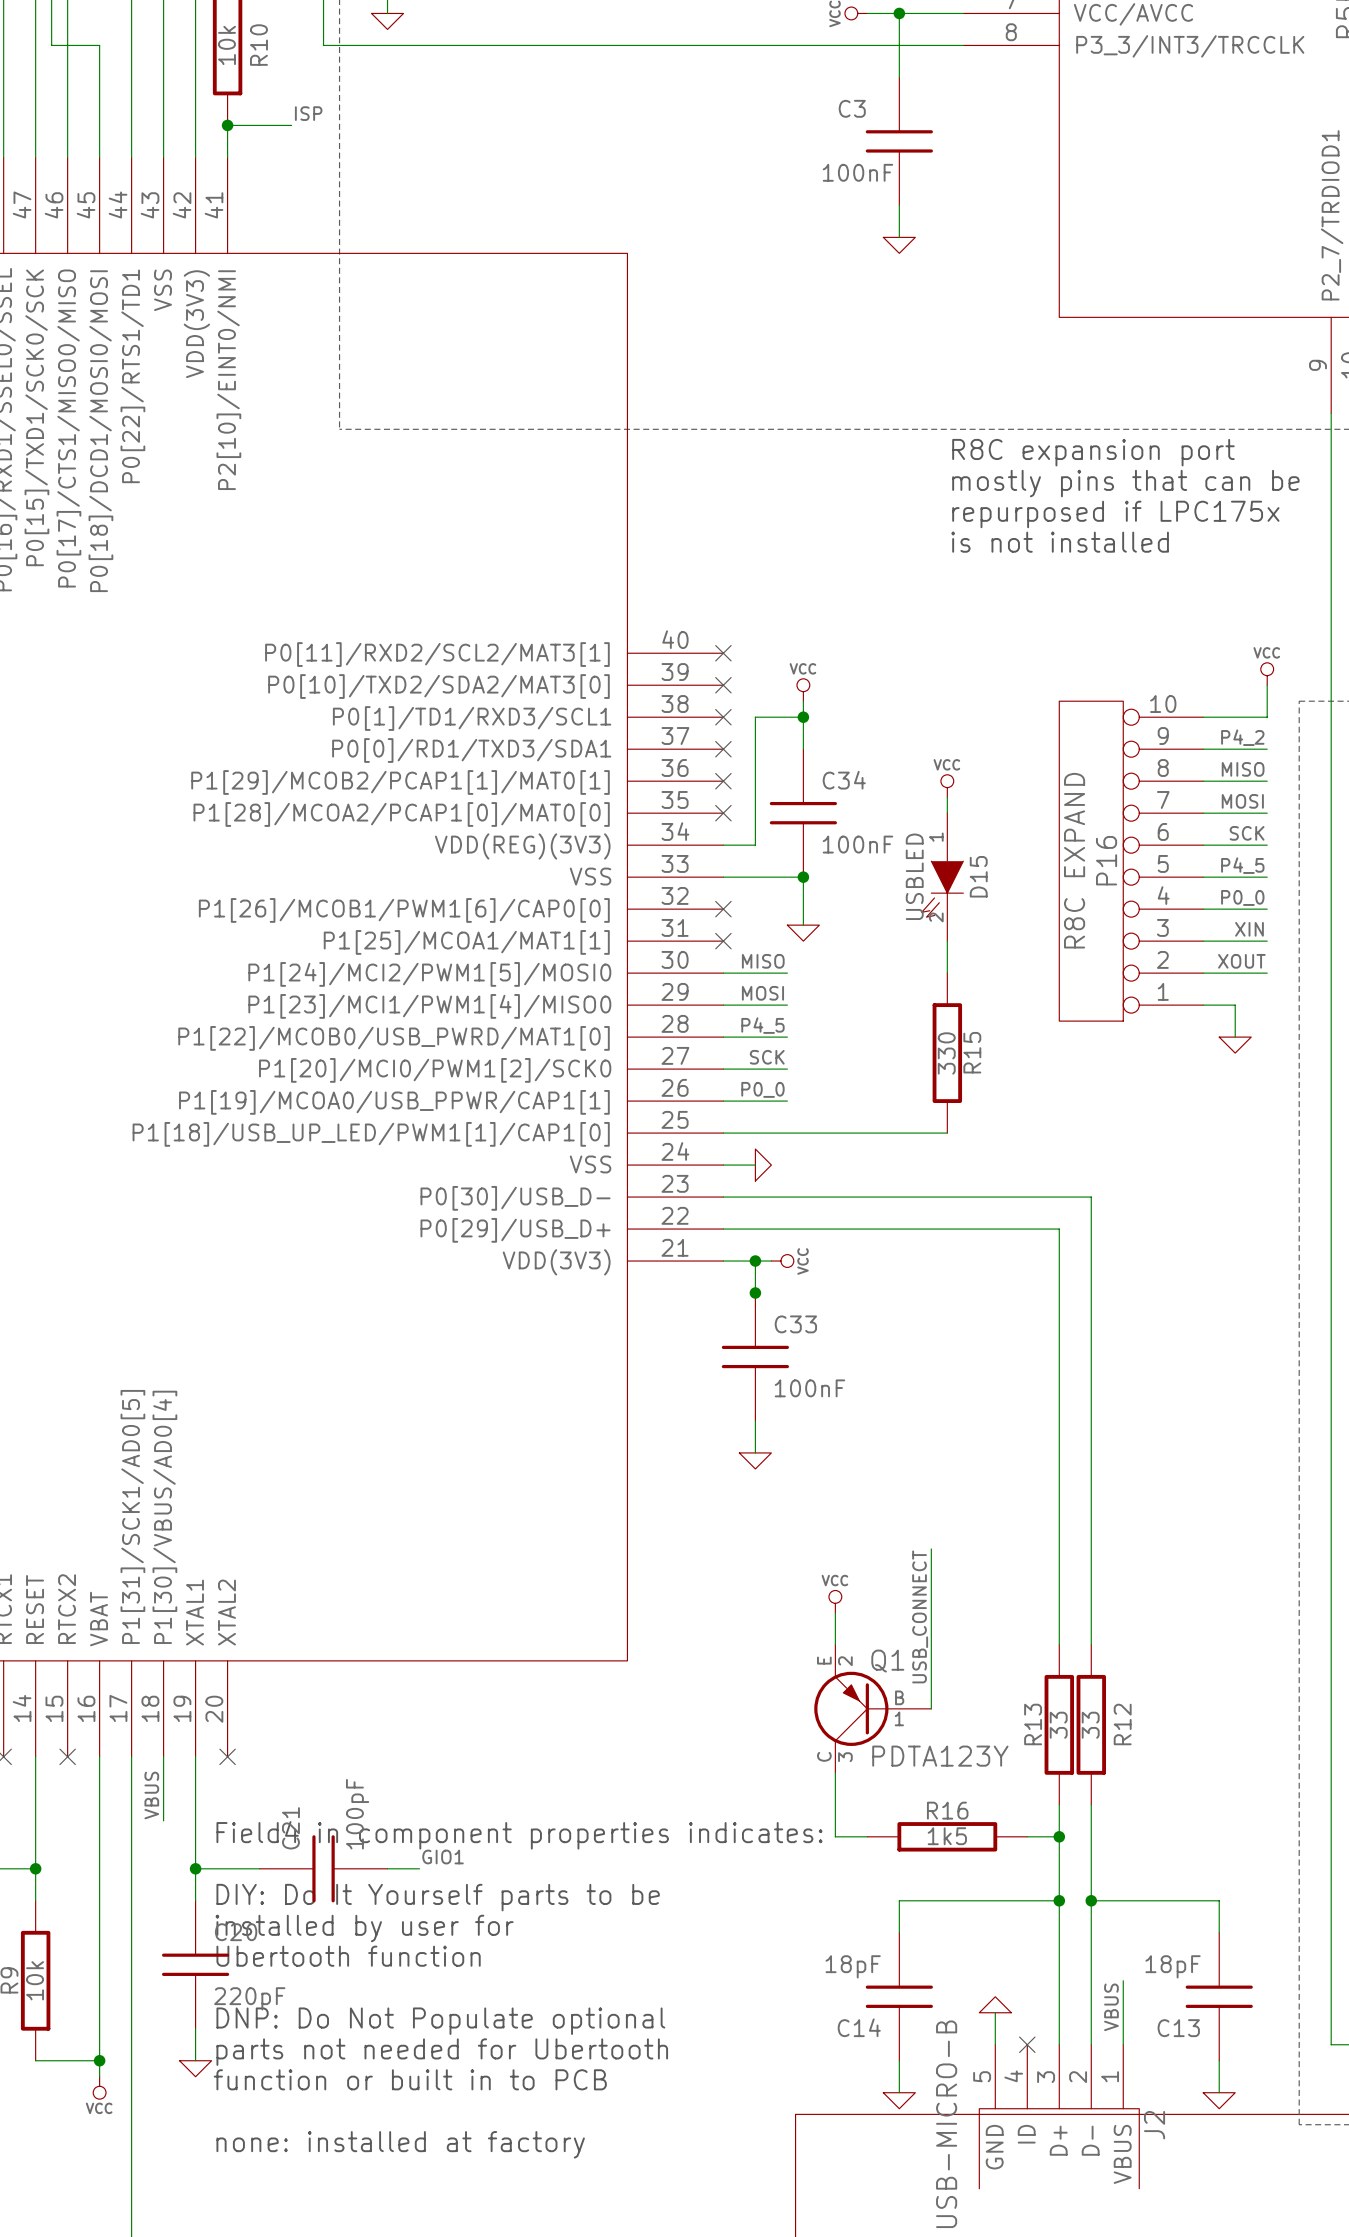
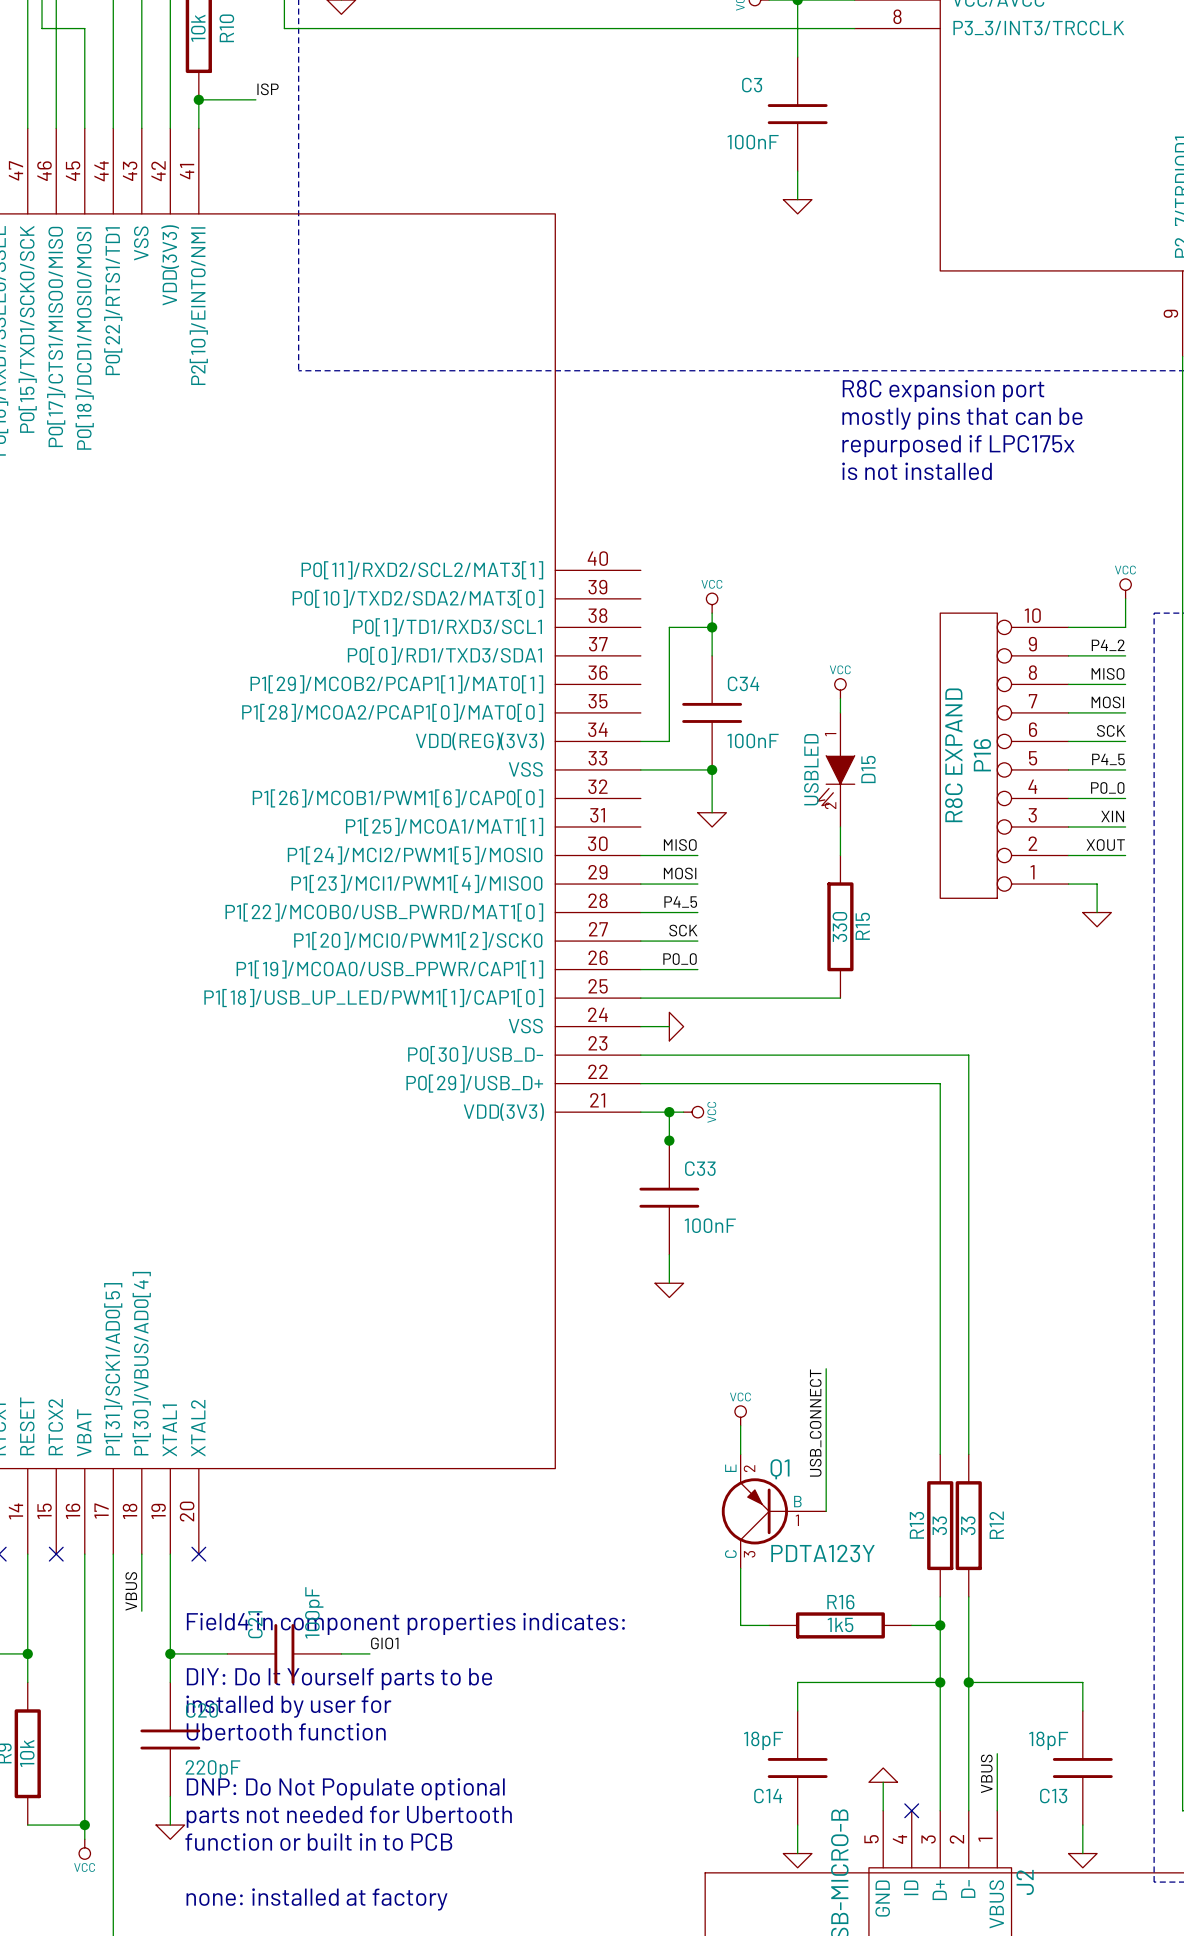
no-connect mark: (723, 653) -> none
no-connect mark: (723, 685) -> none
no-connect mark: (723, 717) -> none
no-connect mark: (723, 749) -> none
no-connect mark: (723, 781) -> none
no-connect mark: (723, 813) -> none
no-connect mark: (723, 909) -> none
no-connect mark: (723, 941) -> none

